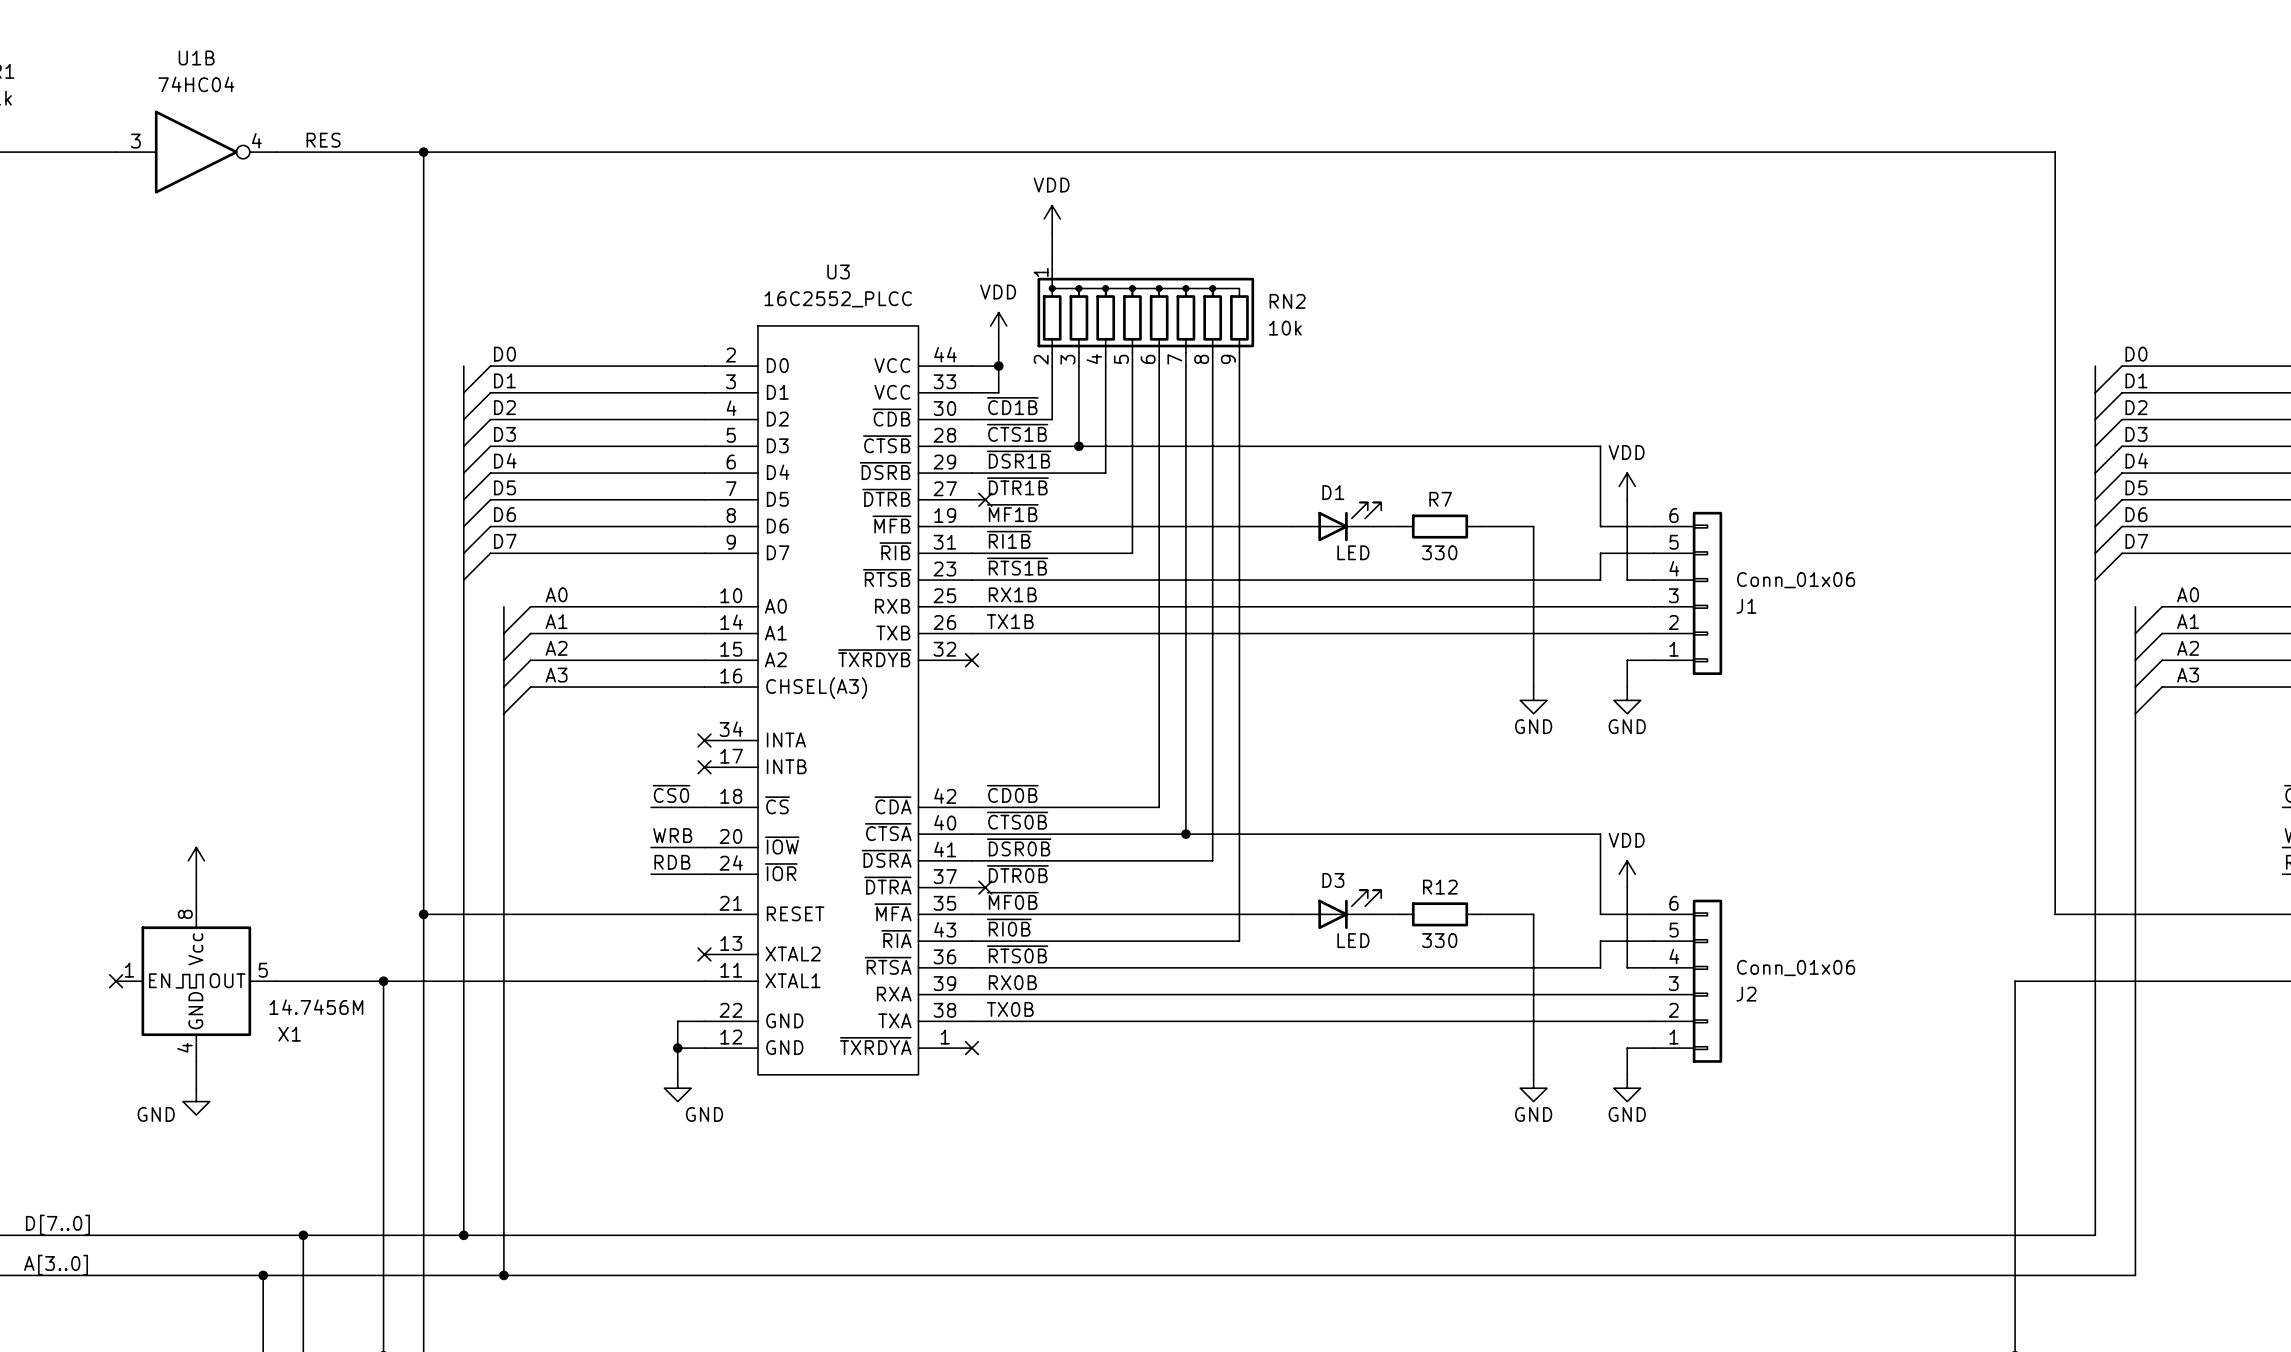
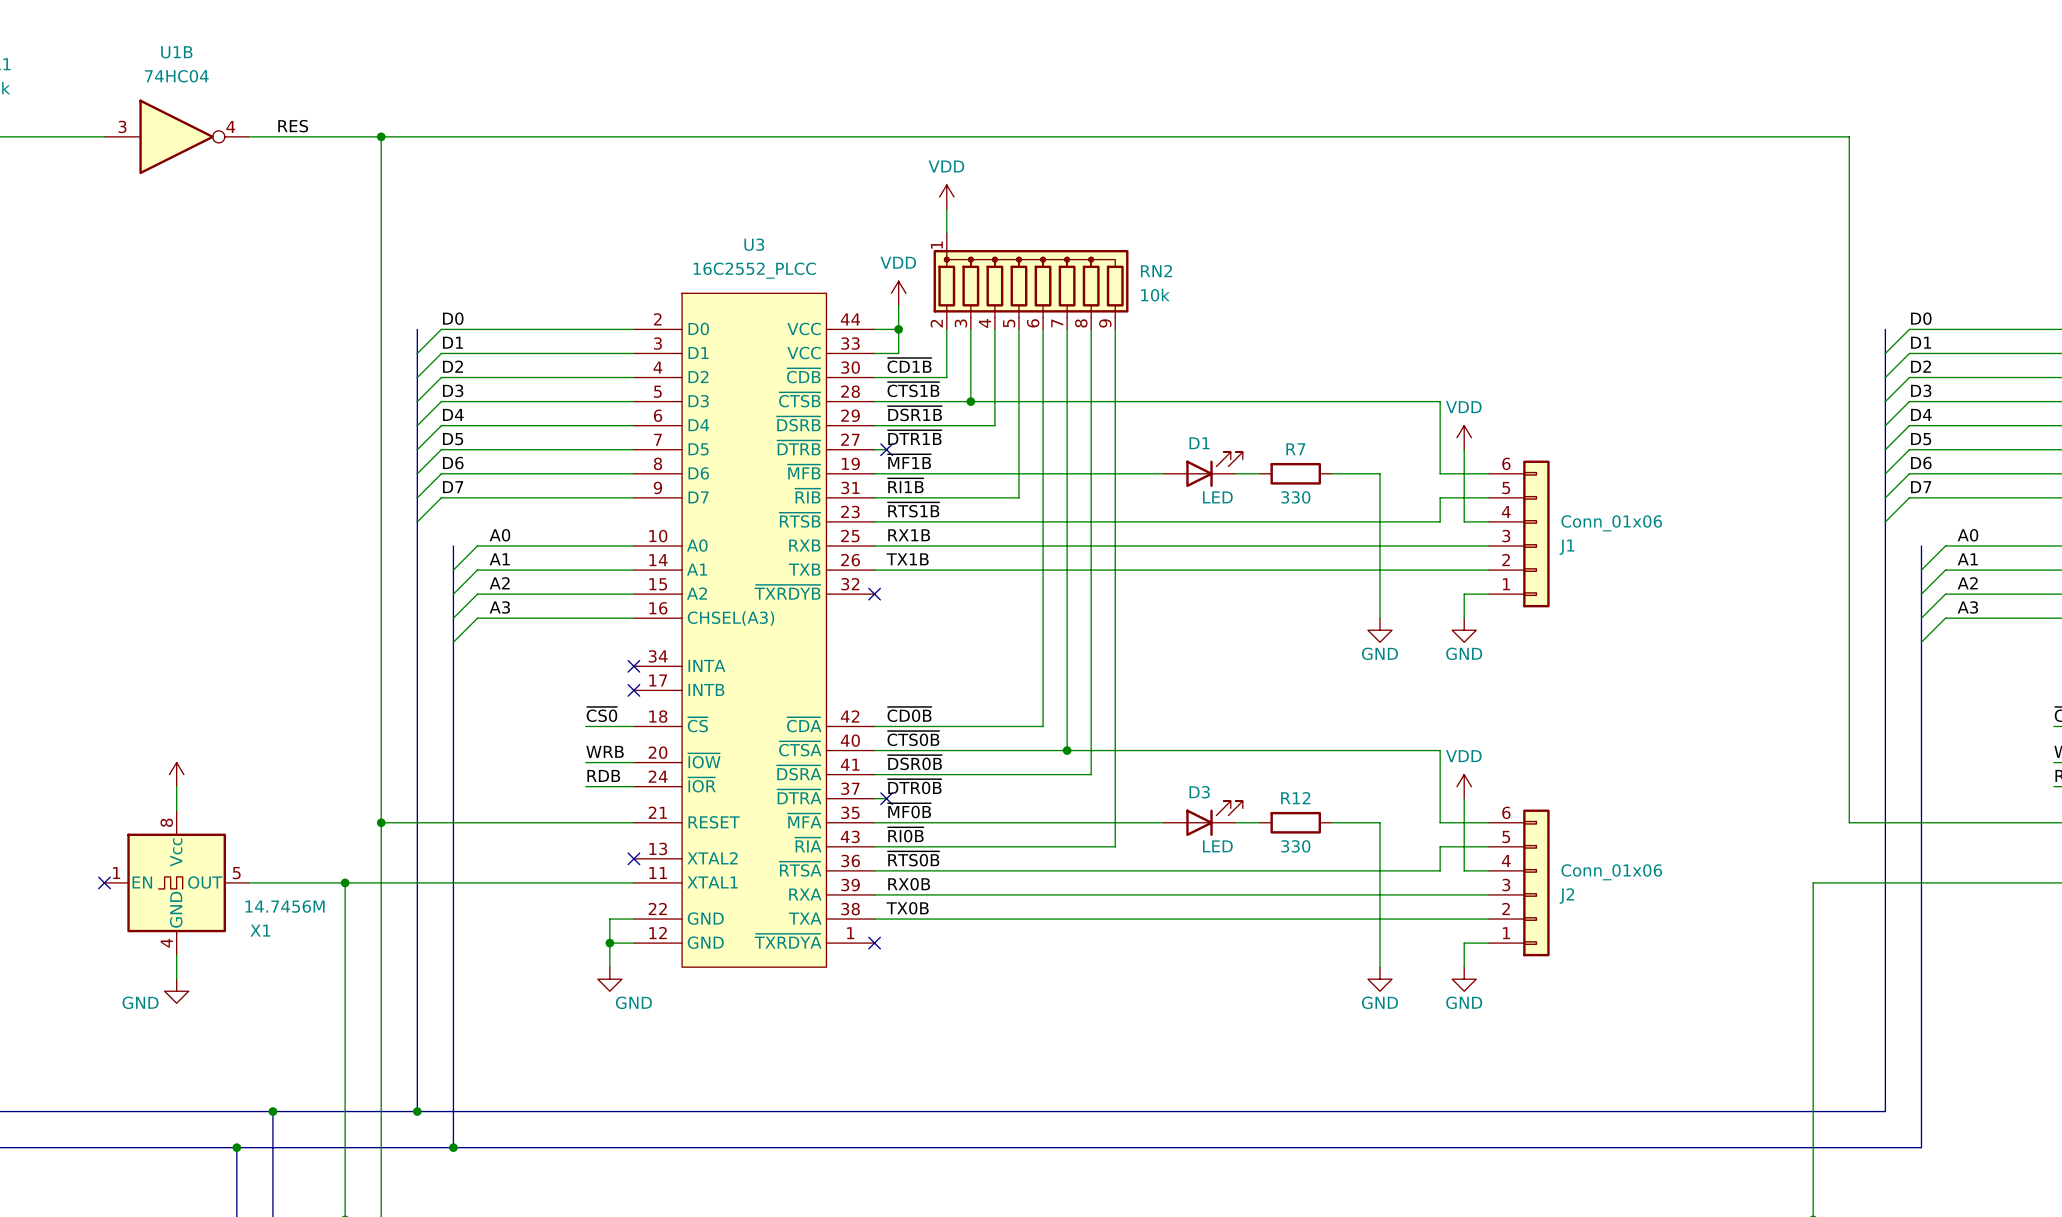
label: D[7..0] (57, 1224) -> none
label: A[3..0] (56, 1265) -> none

